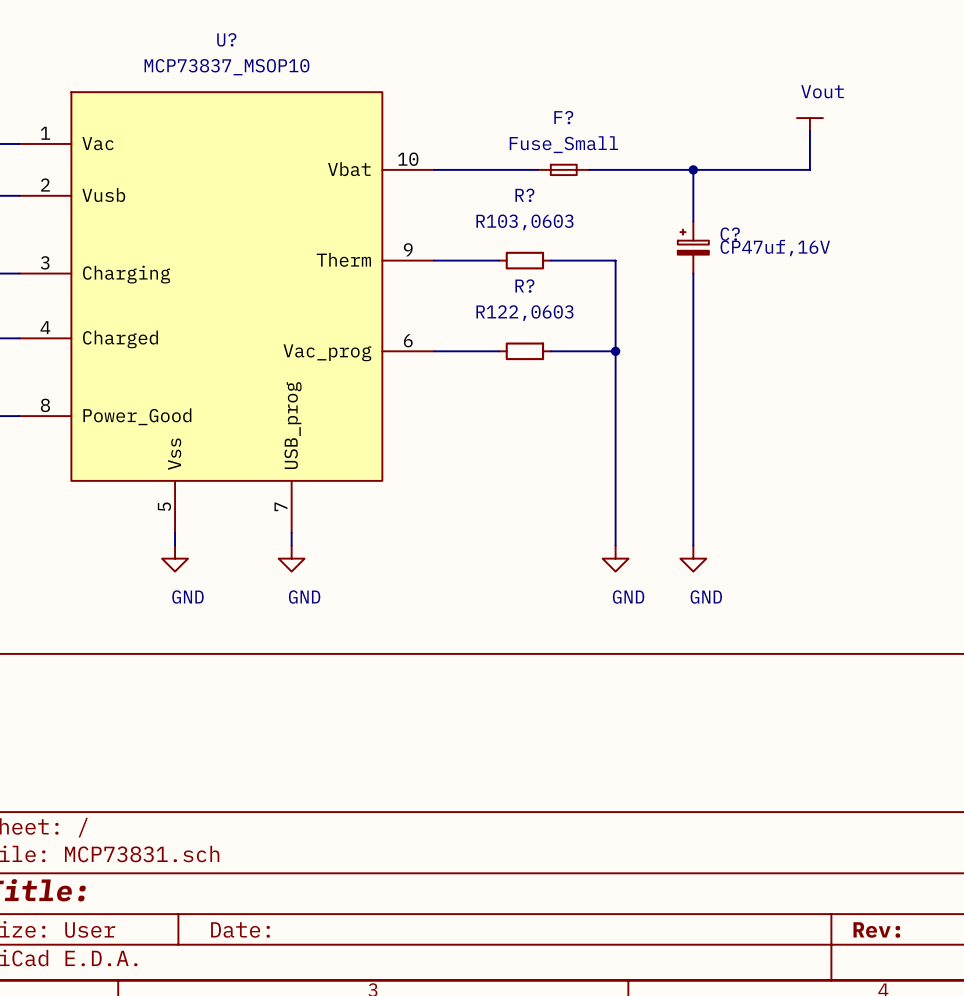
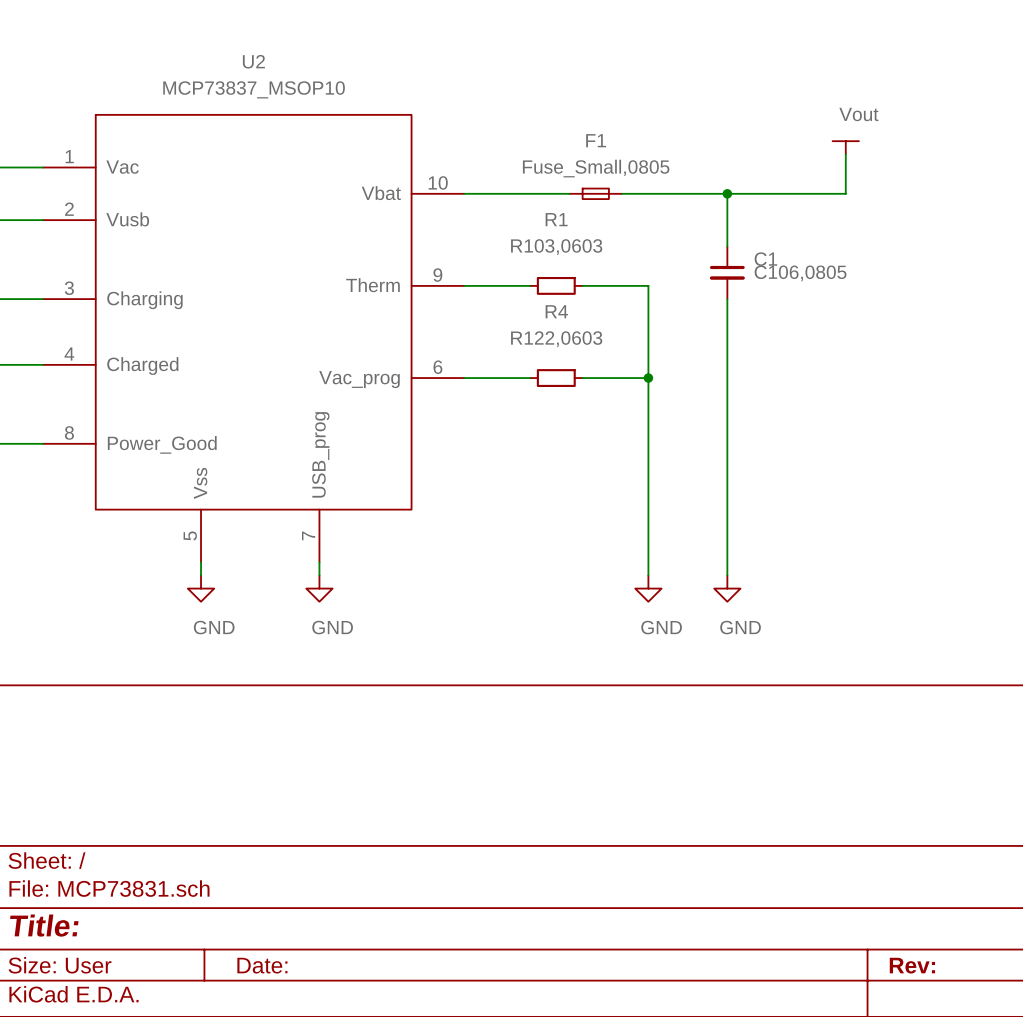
U? name: U? (226, 39) -> U2 (253, 61)
F? name: F? (563, 117) -> F1 (596, 140)
F? value: Fuse_Small (563, 144) -> Fuse_Small,0805 (596, 168)
R? name: R? (524, 195) -> R1 (556, 219)
C?: CP47uf,16V (693, 247) -> none
C1: none -> C106,0805 (727, 272)
R? name: R? (524, 286) -> R4 (556, 311)

